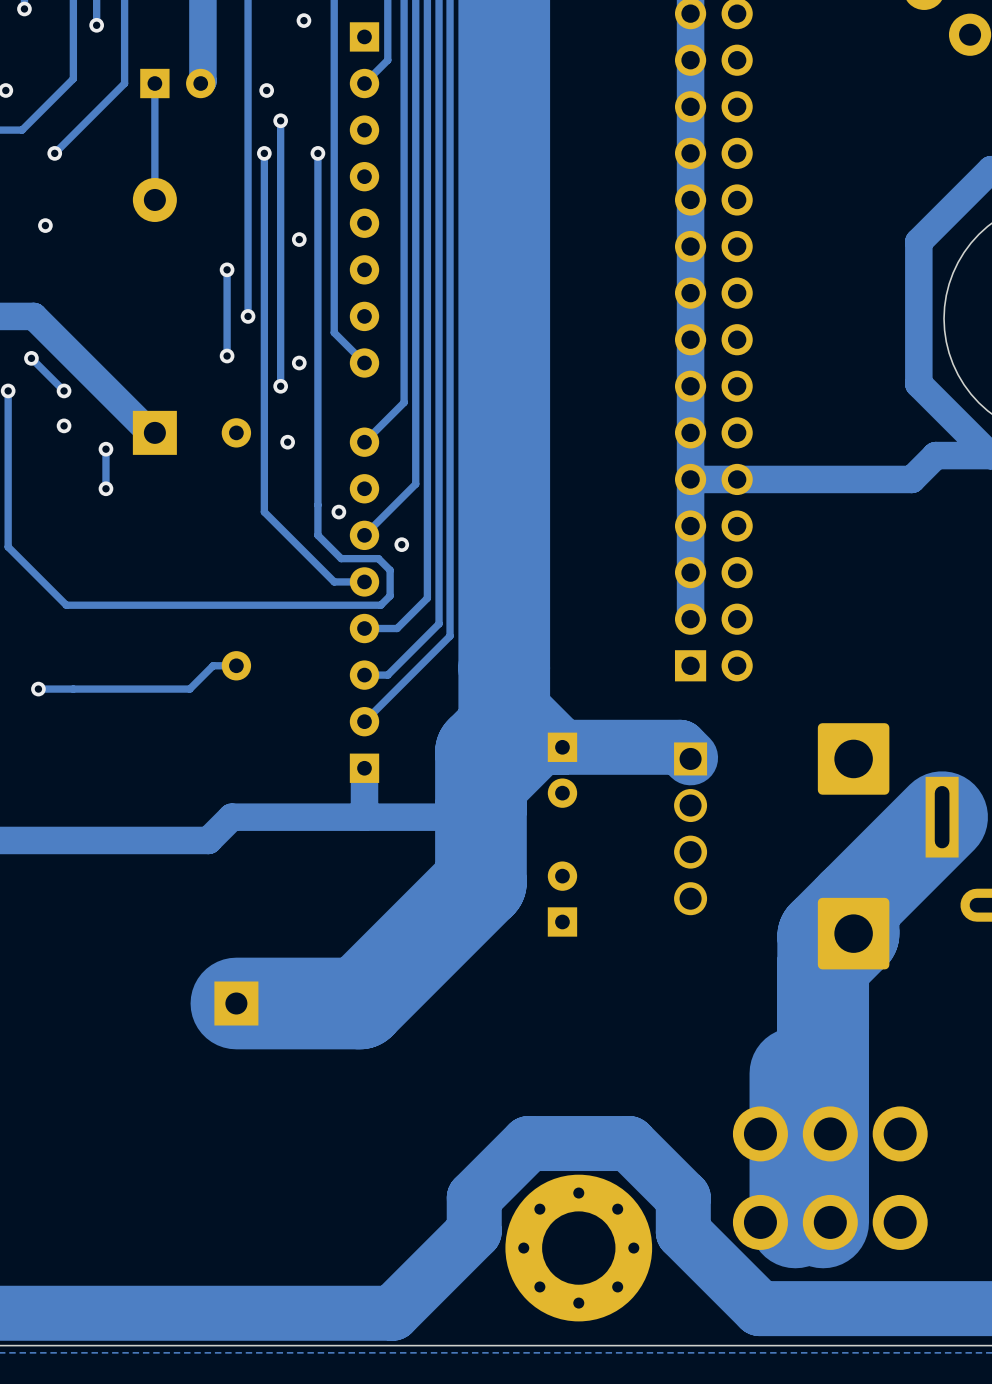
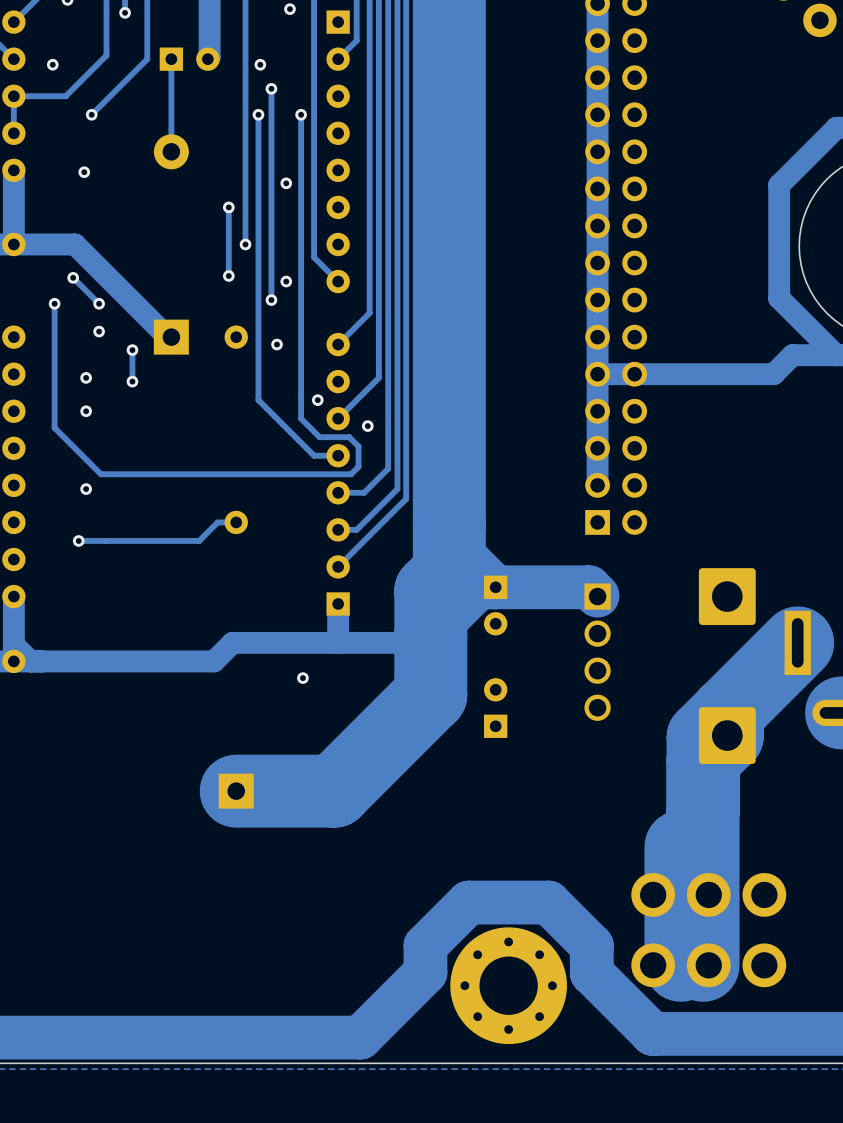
via: none -> (86, 377)
via: none -> (86, 411)
via: none -> (86, 489)
via: none -> (302, 678)

